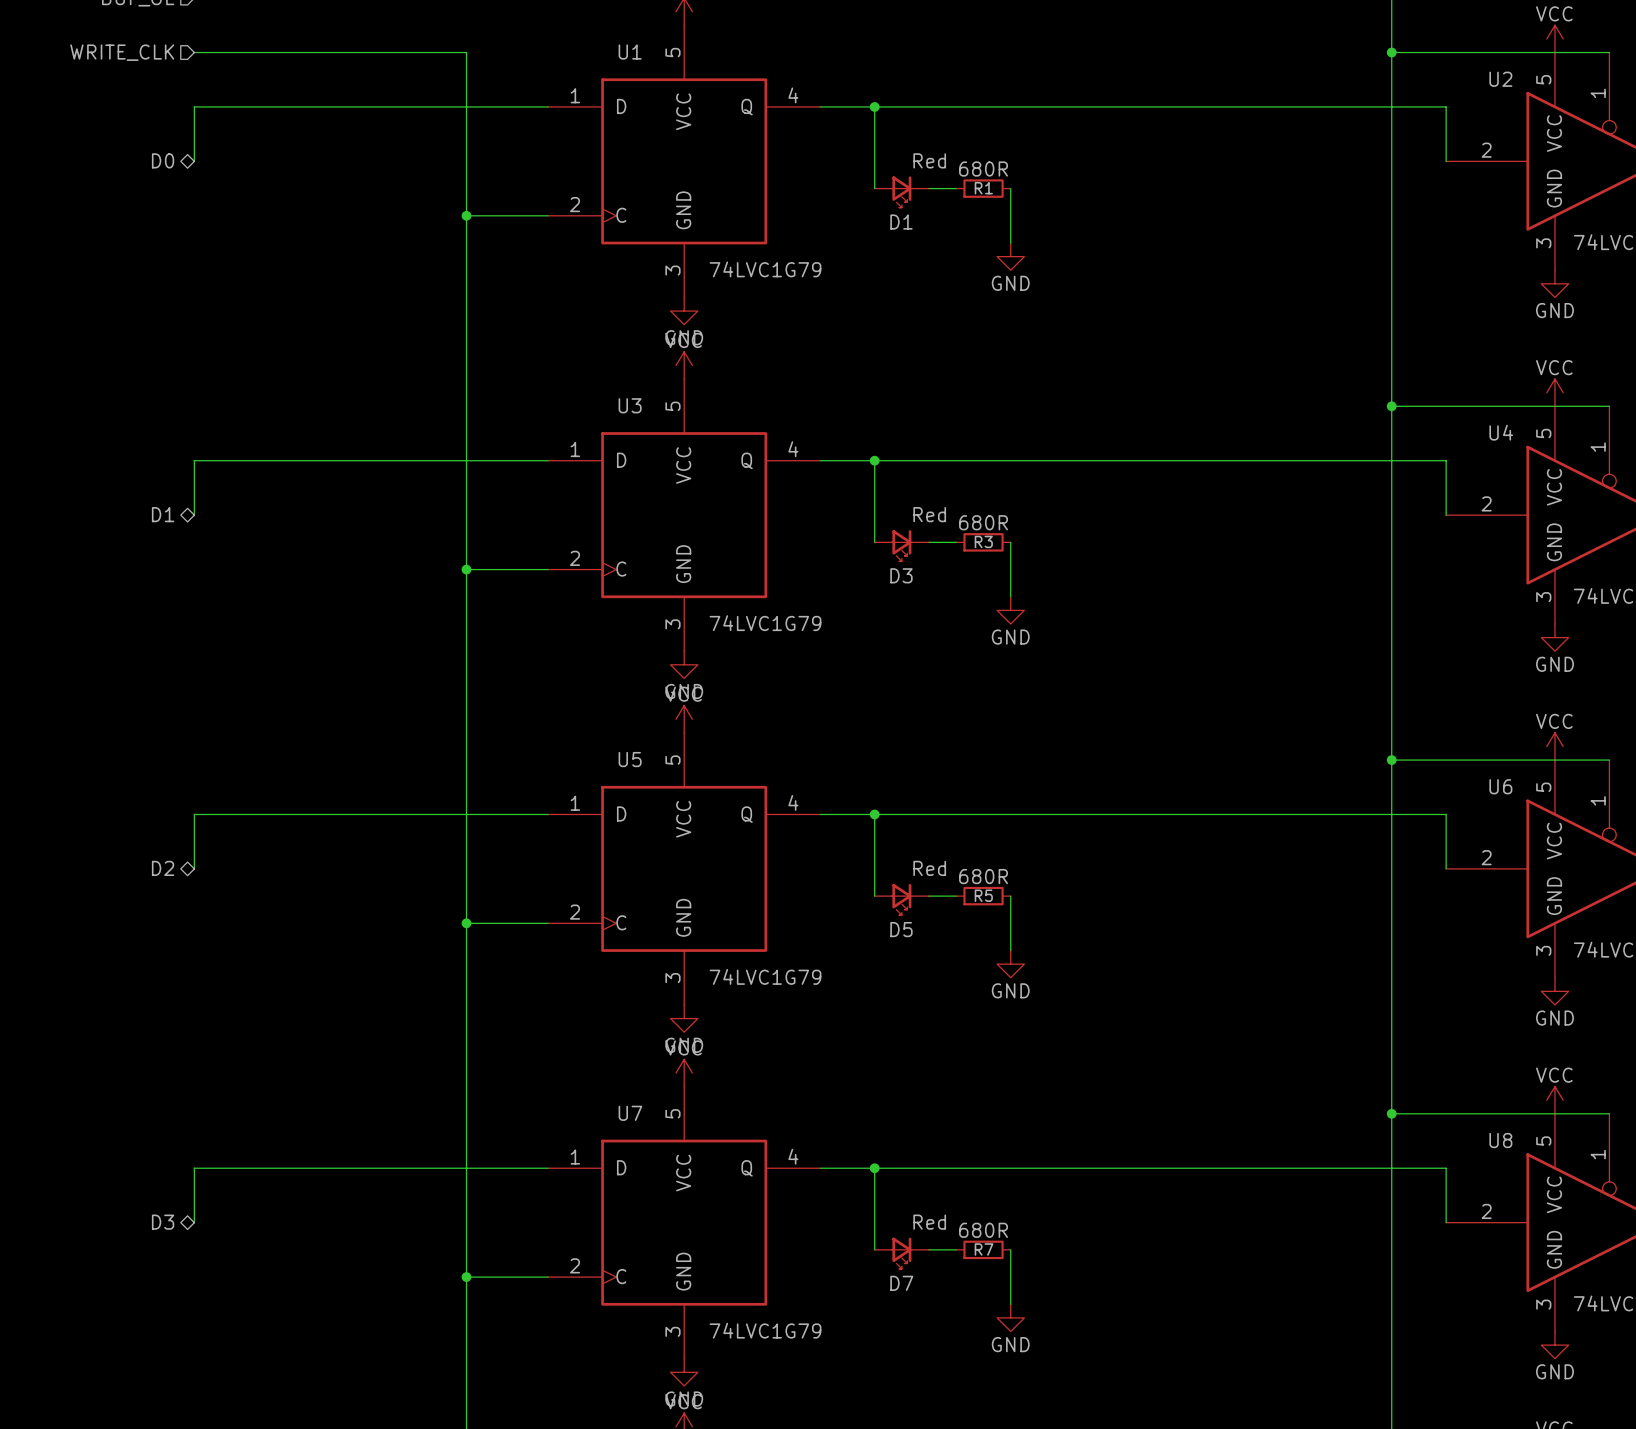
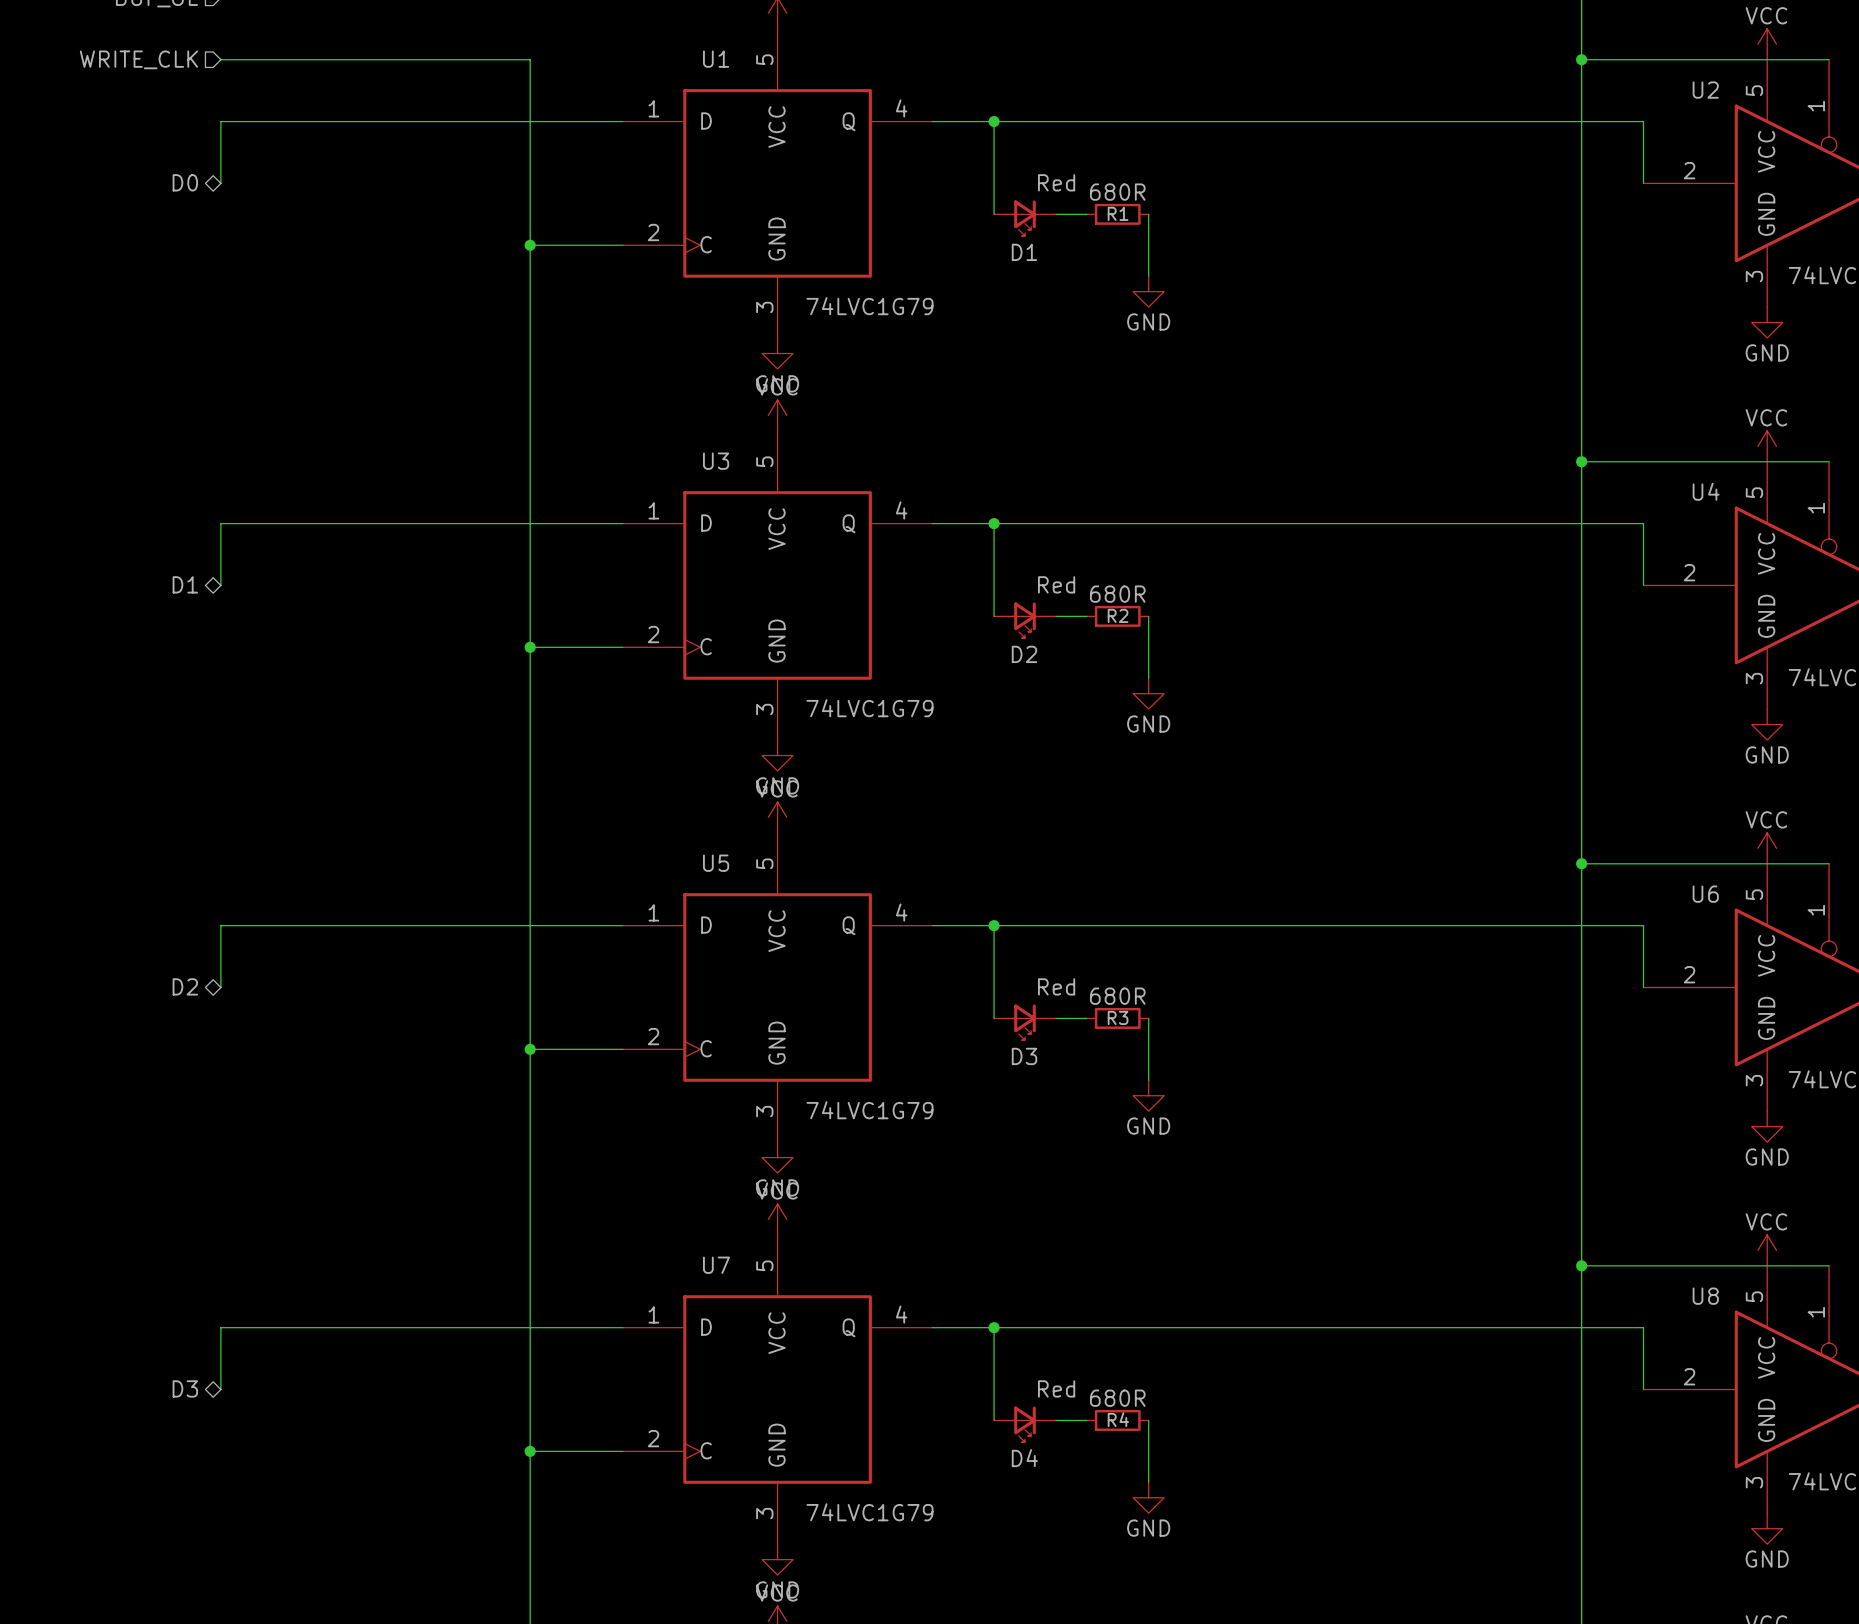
R3 name: R3 (983, 541) -> R2 (1118, 615)
D3 name: D3 (901, 575) -> D2 (1024, 654)
R5 name: R5 (983, 895) -> R3 (1118, 1017)
D5 name: D5 (901, 929) -> D3 (1024, 1056)
R7 name: R7 (984, 1249) -> R4 (1118, 1419)
D7 name: D7 (901, 1283) -> D4 (1024, 1458)

